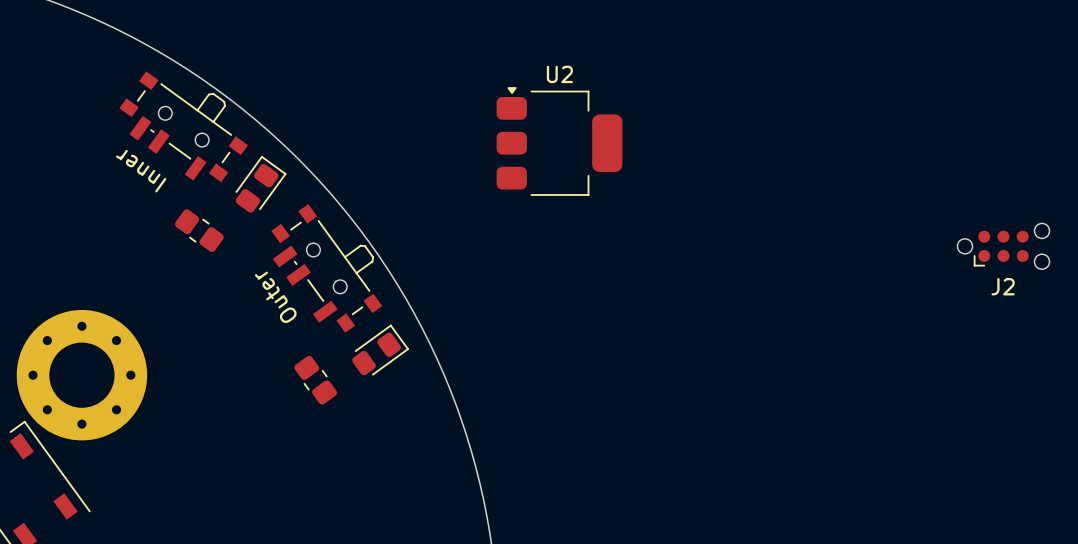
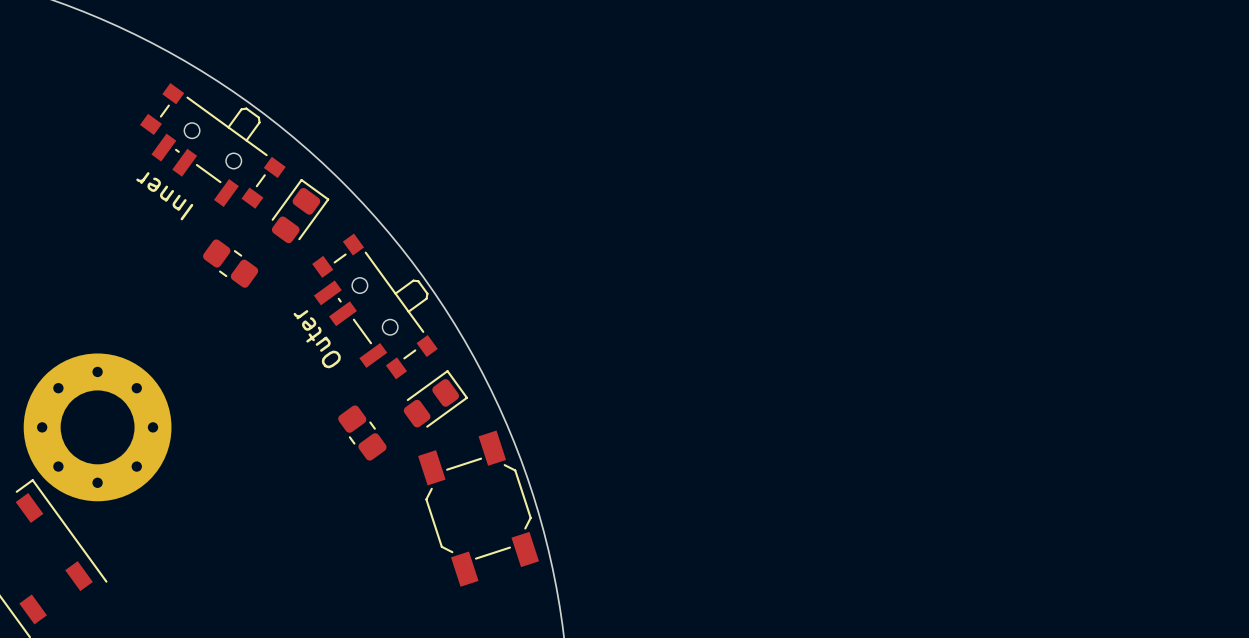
U2: (559, 141) -> none
J2: (1003, 246) -> none
part: none -> (478, 508)

